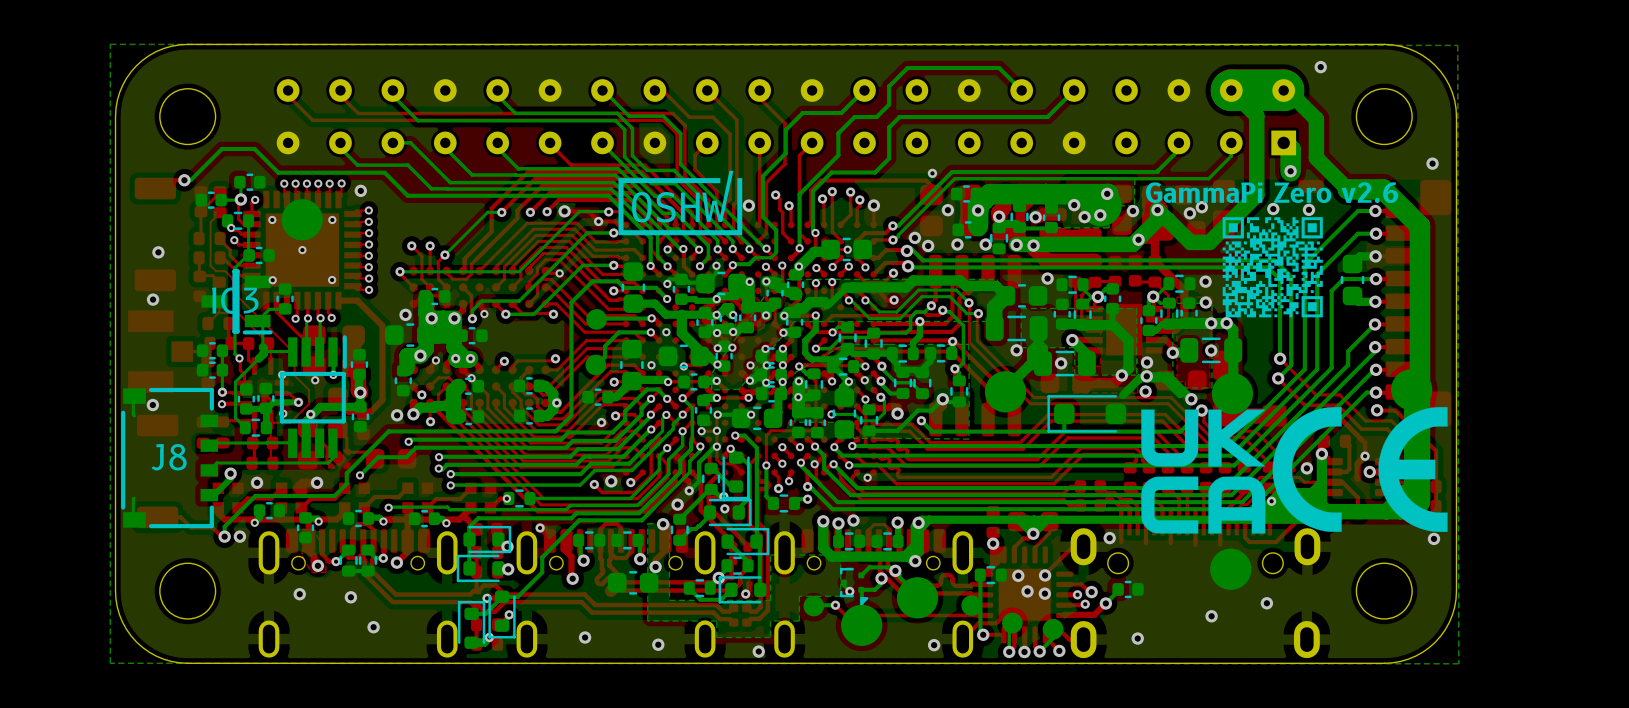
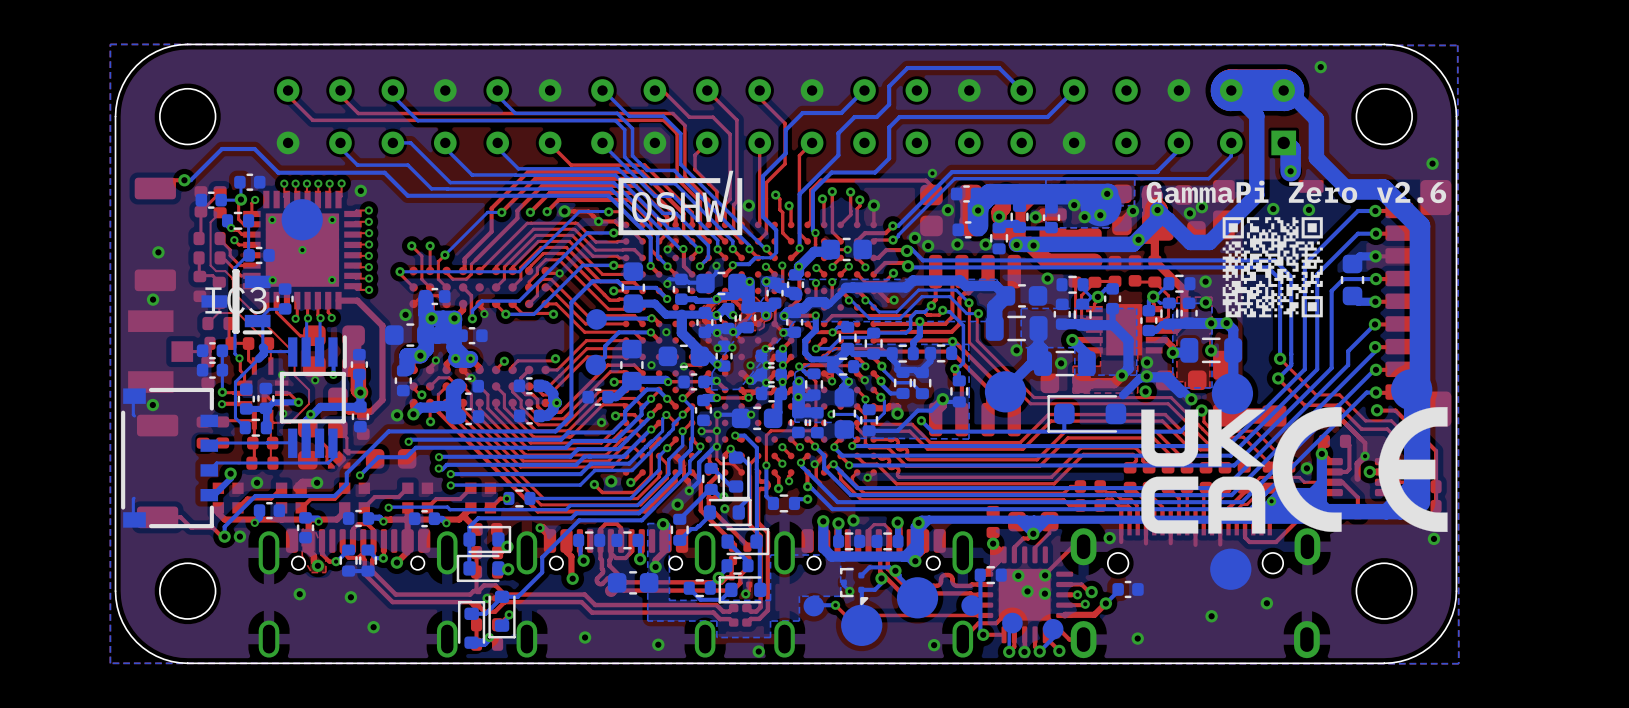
J8 name: J8 (169, 457) -> none

